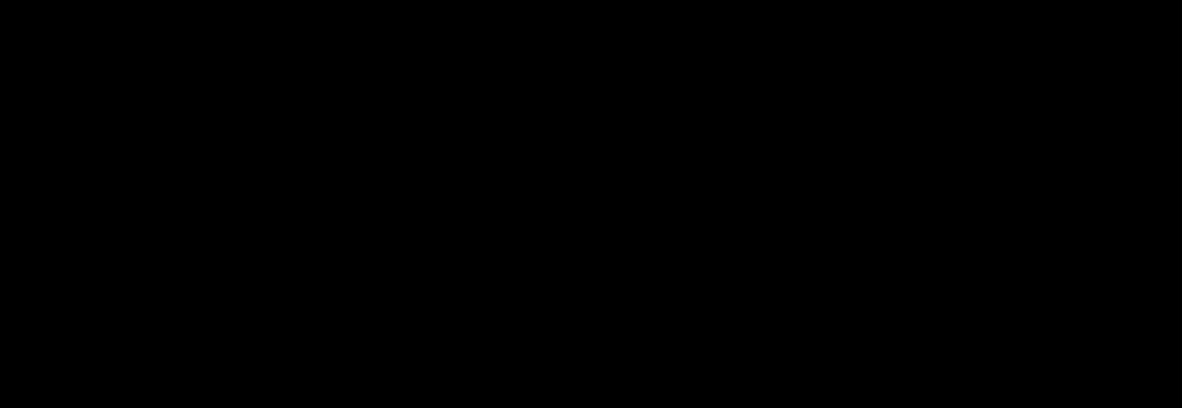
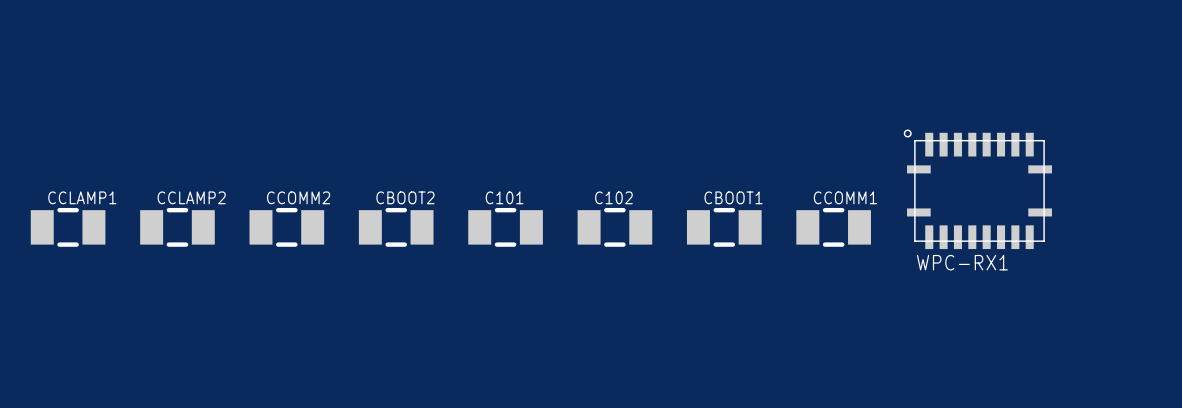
WPC-RX1: none -> (977, 189)
CCLAMP1: none -> (68, 227)
CCLAMP2: none -> (177, 227)
CCOMM2: none -> (286, 227)
CBOOT2: none -> (396, 227)
C101: none -> (505, 227)
C102: none -> (614, 227)
CBOOT1: none -> (724, 227)
CCOMM1: none -> (833, 227)

